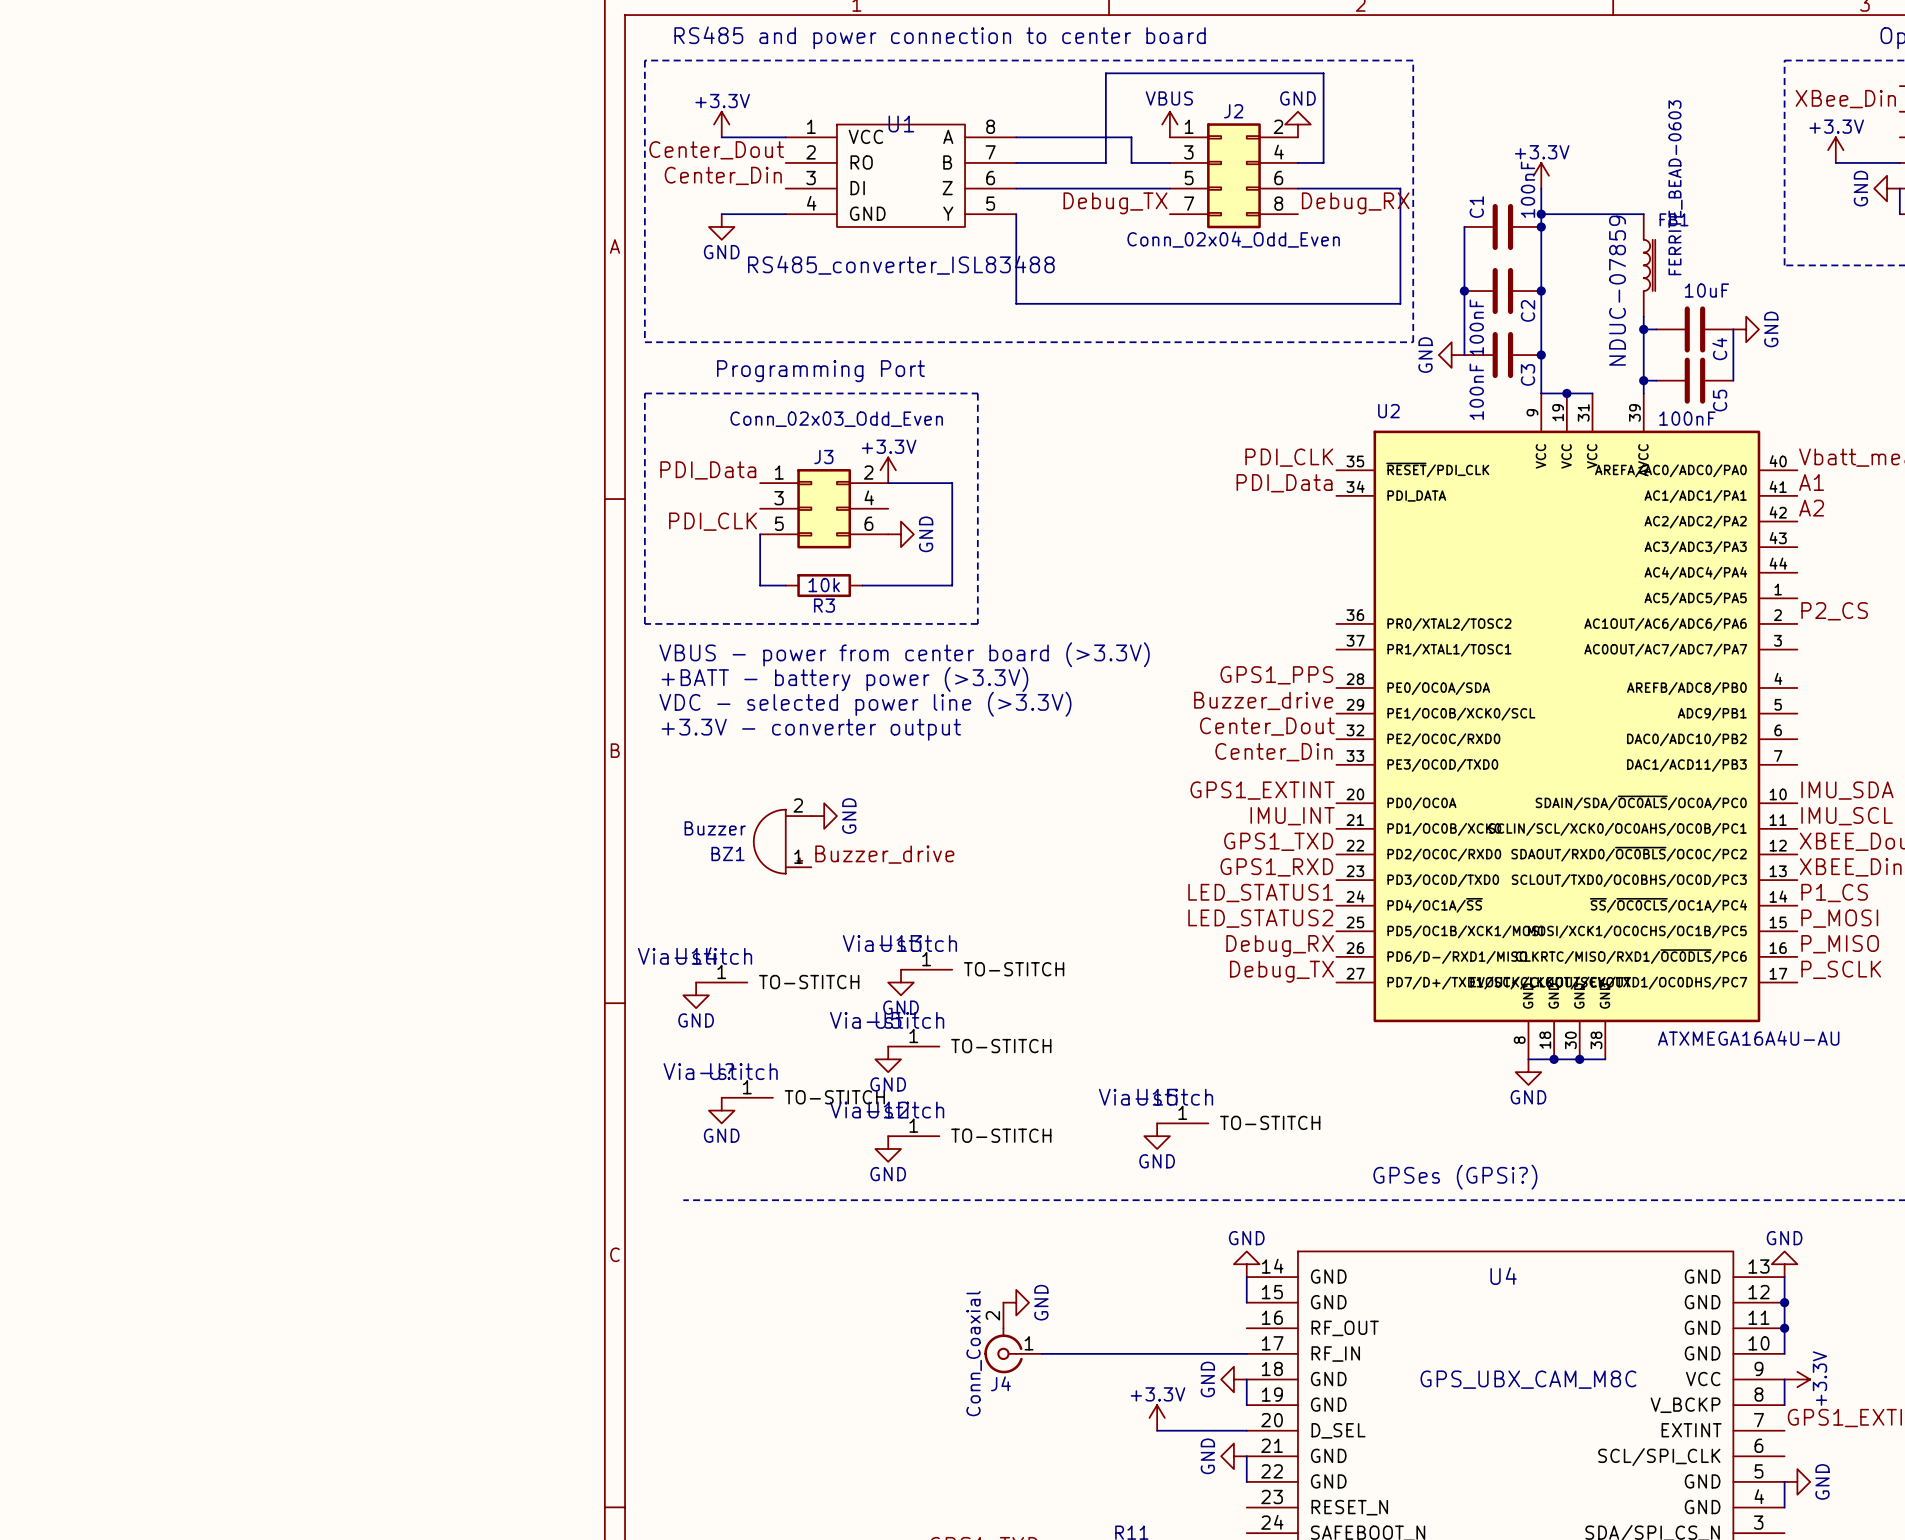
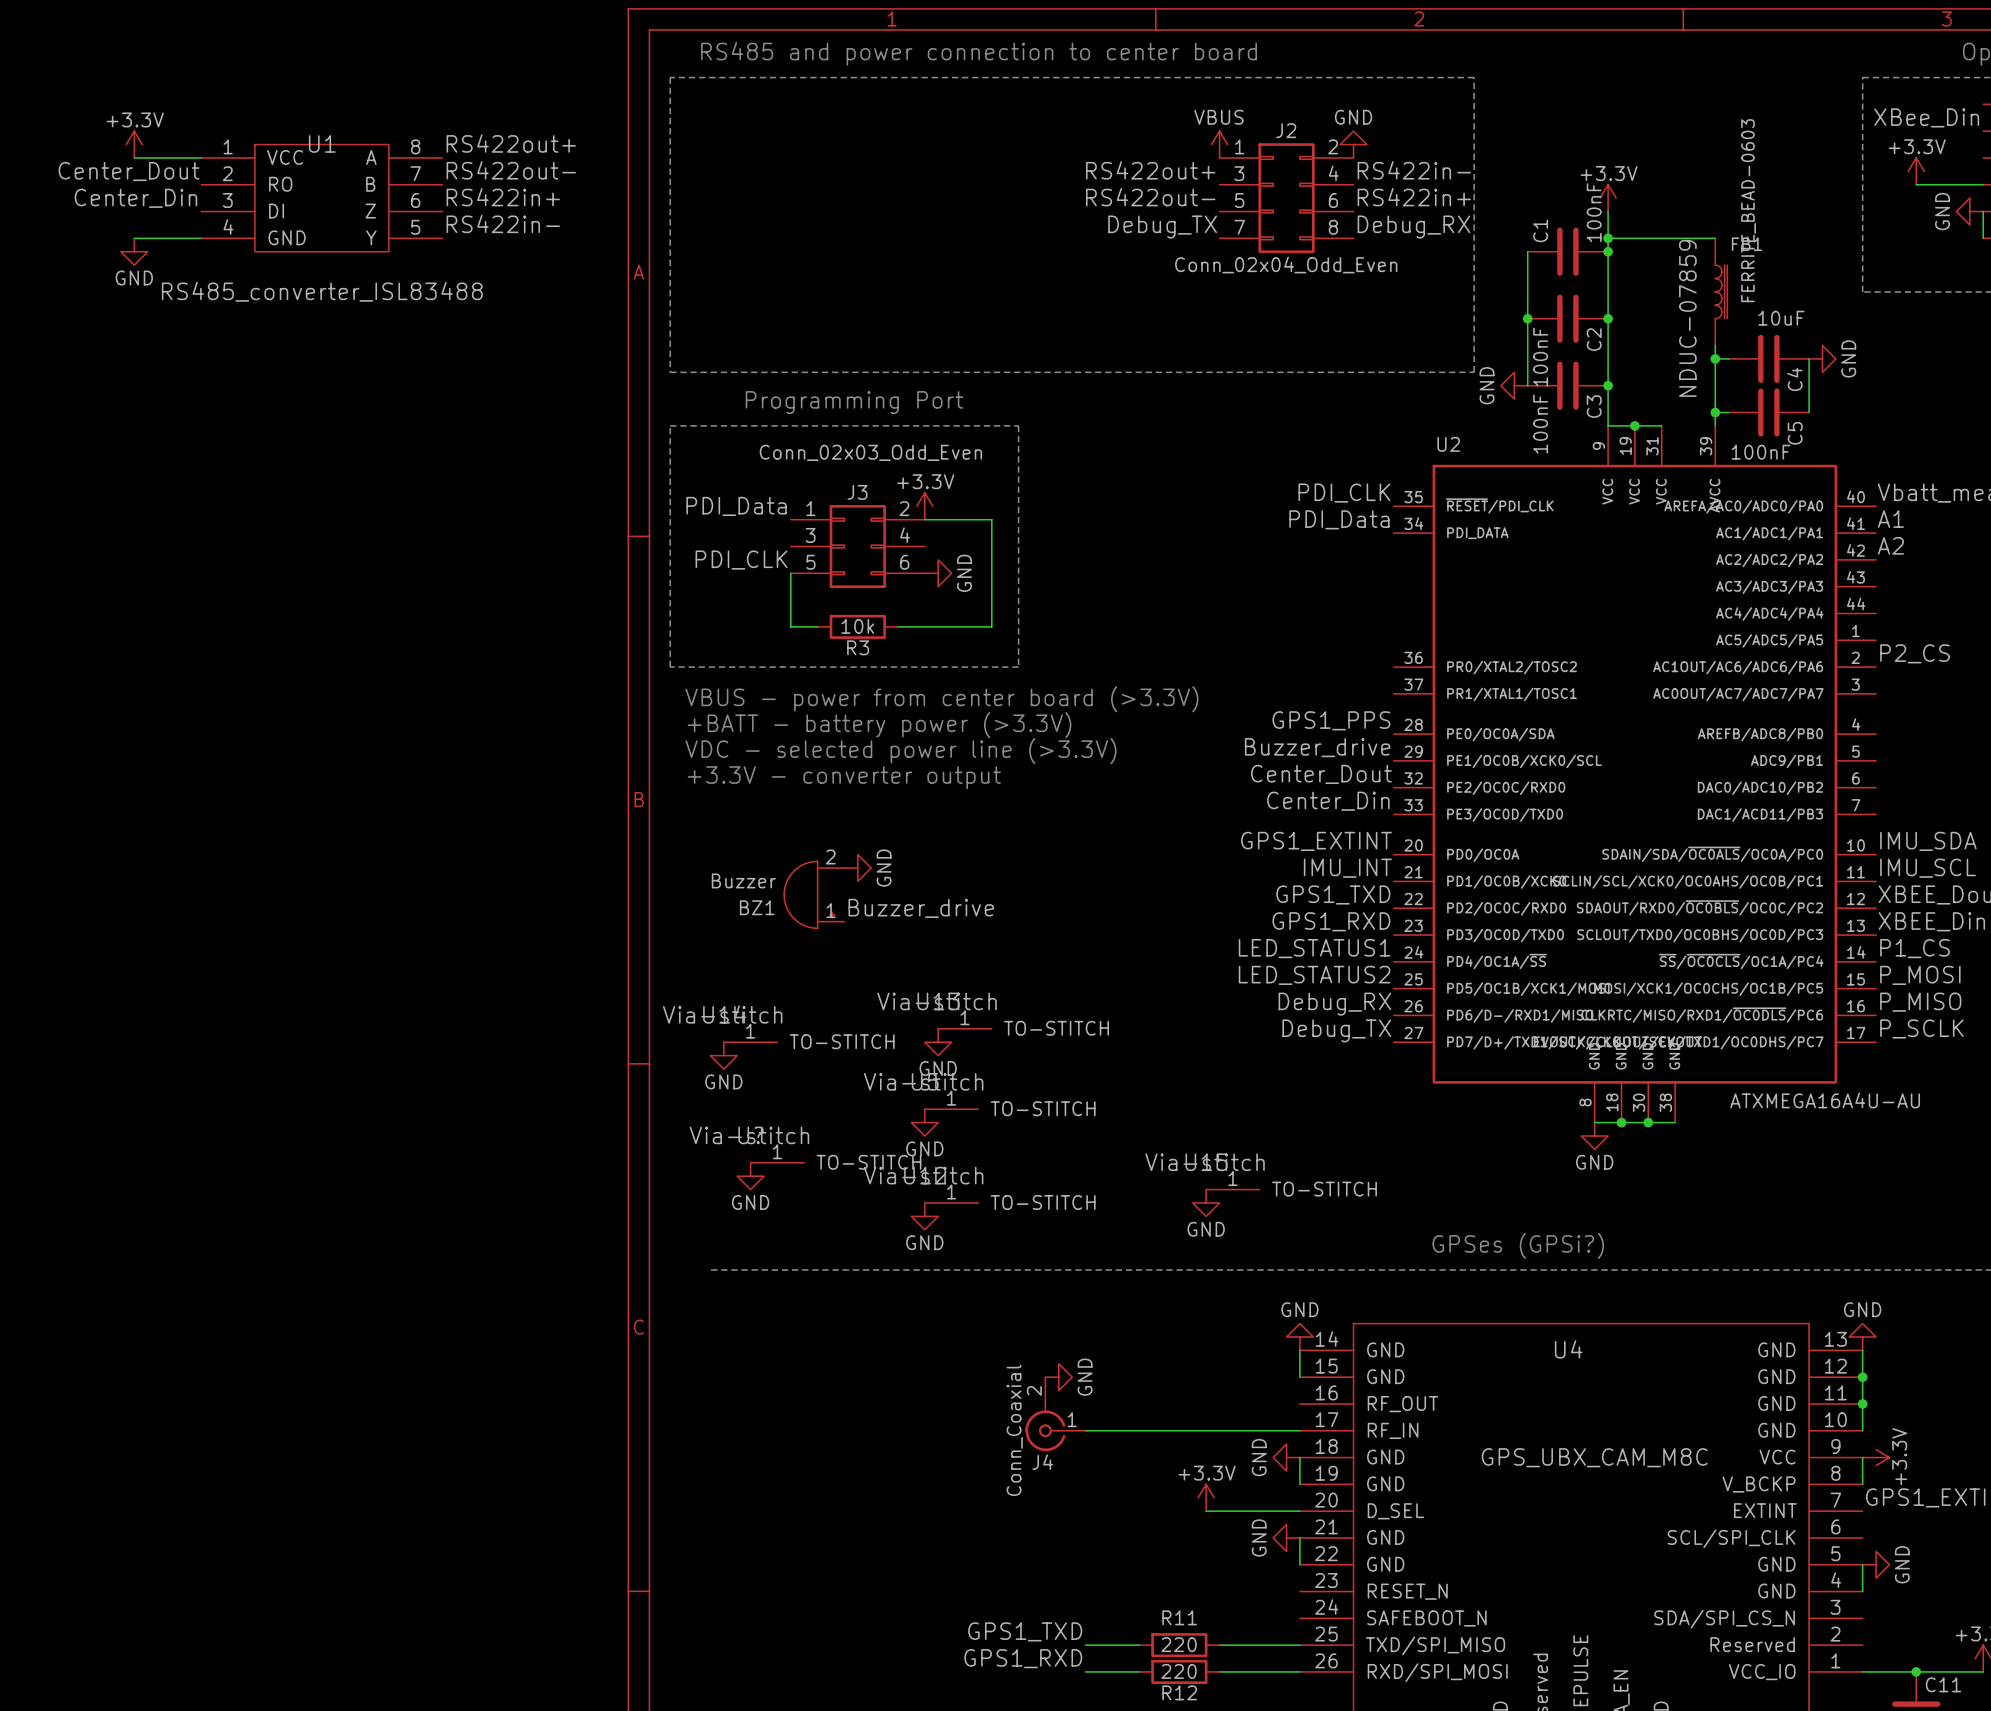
label: none -> RS422out+ (511, 143)
power symbol: none -> +3.3V (134, 144)
power symbol: +3.3V (721, 124) -> none
wire: none -> (134, 157) (201, 157)
wire: (721, 137) (785, 137) -> none
wire: (1016, 137) (1131, 137) (1131, 162) (1169, 162) -> none
label: none -> RS422out- (511, 170)
label: none -> RS422out+ (1150, 170)
label: none -> RS422in- (1414, 170)
label: none -> Center_Dout (129, 171)
label: Center_Dout (716, 150) -> none
wire: (1016, 162) (1105, 162) (1105, 73) (1323, 73) (1323, 162) (1297, 162) -> none
label: none -> RS422in+ (503, 197)
label: none -> RS422out- (1150, 197)
label: none -> RS422in+ (1414, 197)
label: none -> Center_Din (135, 198)
label: Center_Din (723, 175) -> none
U1 position: (901, 175) -> (321, 198)
wire: (1016, 188) (1169, 188) -> none
wire: (1297, 188) (1400, 188) (1400, 303) (1016, 303) (1016, 214) -> none
label: none -> RS422in- (503, 223)
wire: none -> (134, 238) (201, 238)
wire: (721, 214) (785, 214) -> none
power symbol: none -> GND (134, 251)
power symbol: GND (721, 226) -> none

